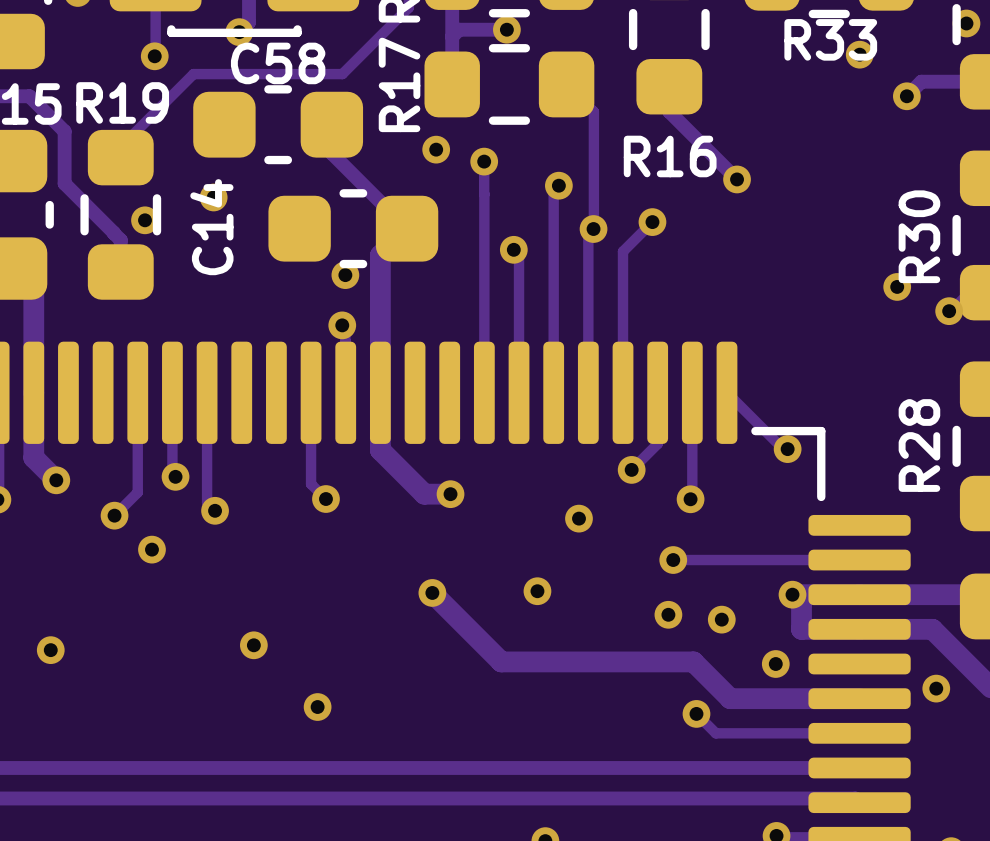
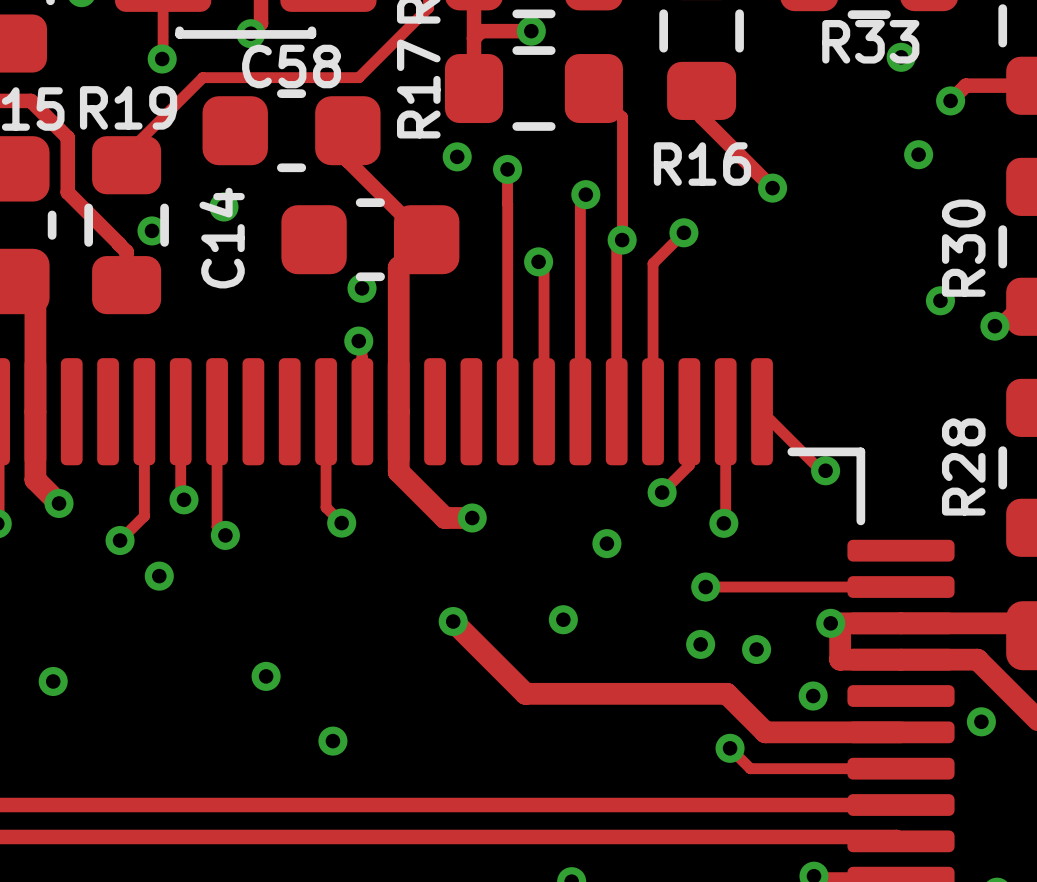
via position: (966, 23) -> (918, 154)

